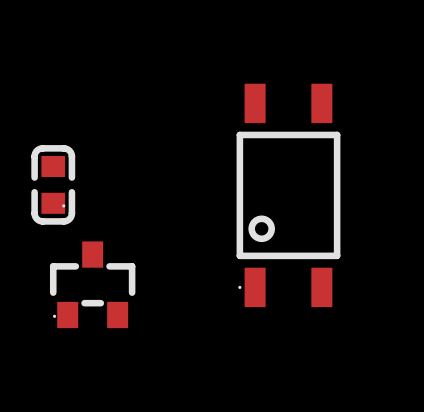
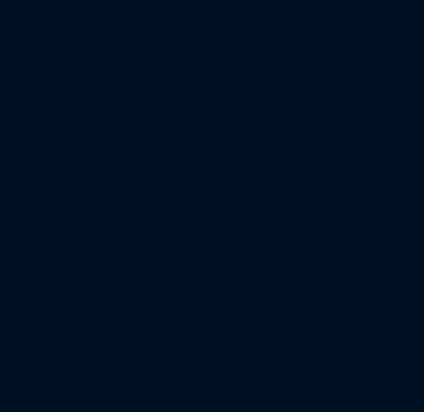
part: (53, 184) -> none
part: (288, 195) -> none
part: (92, 284) -> none

